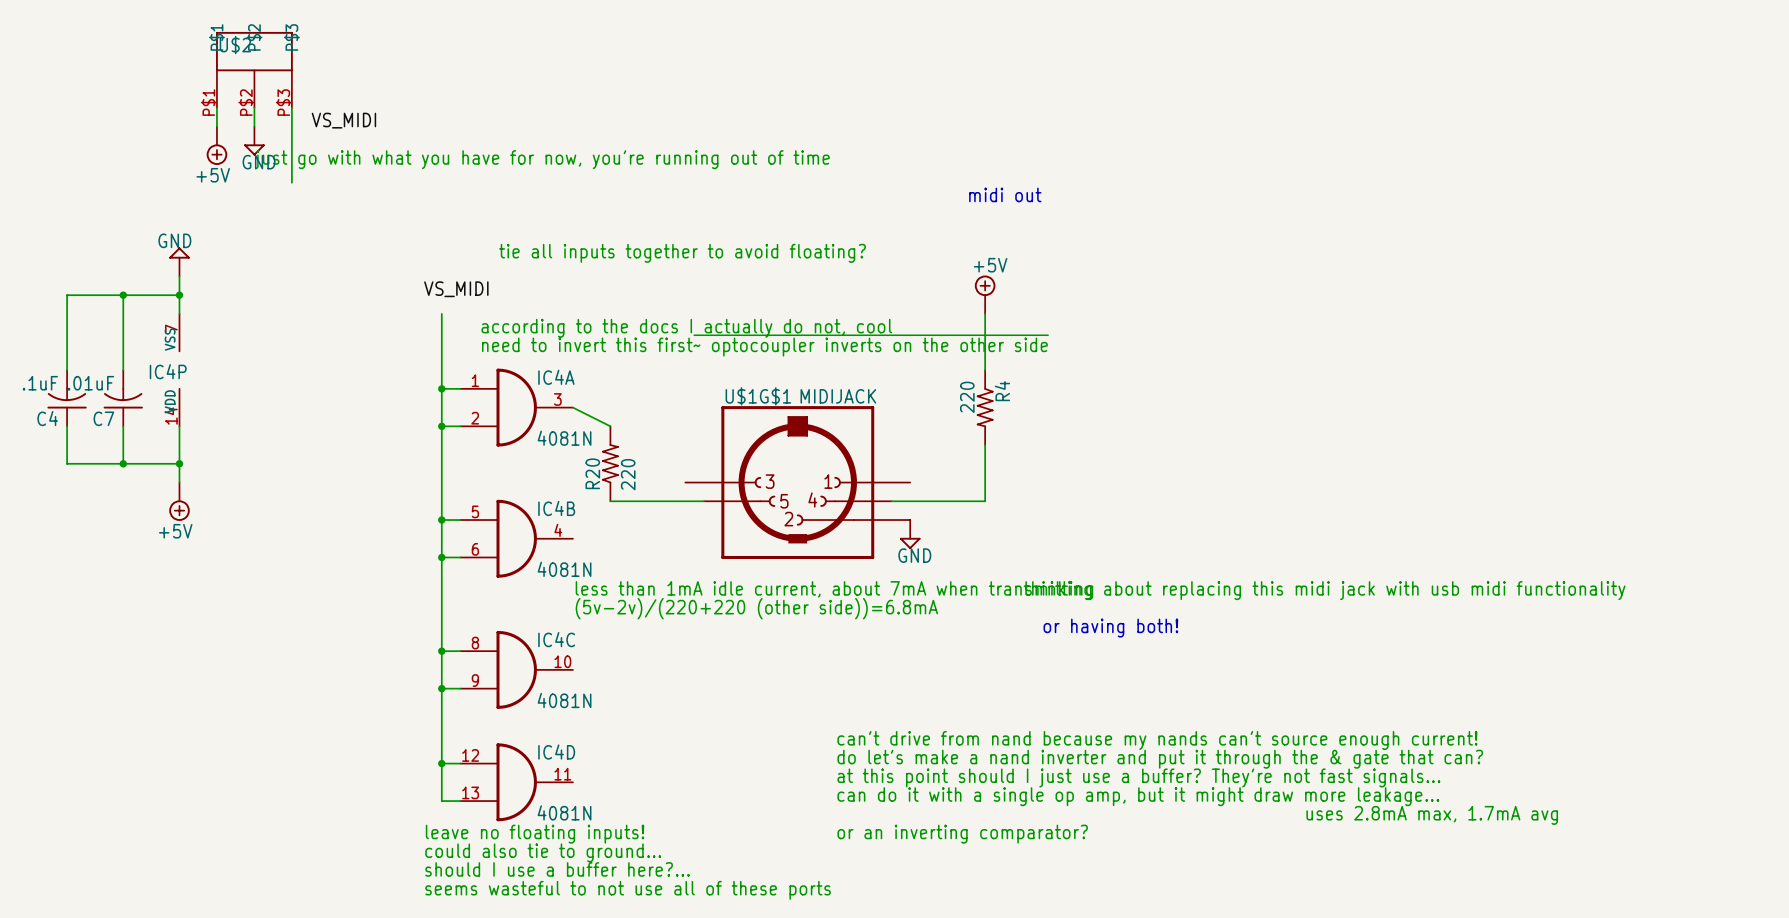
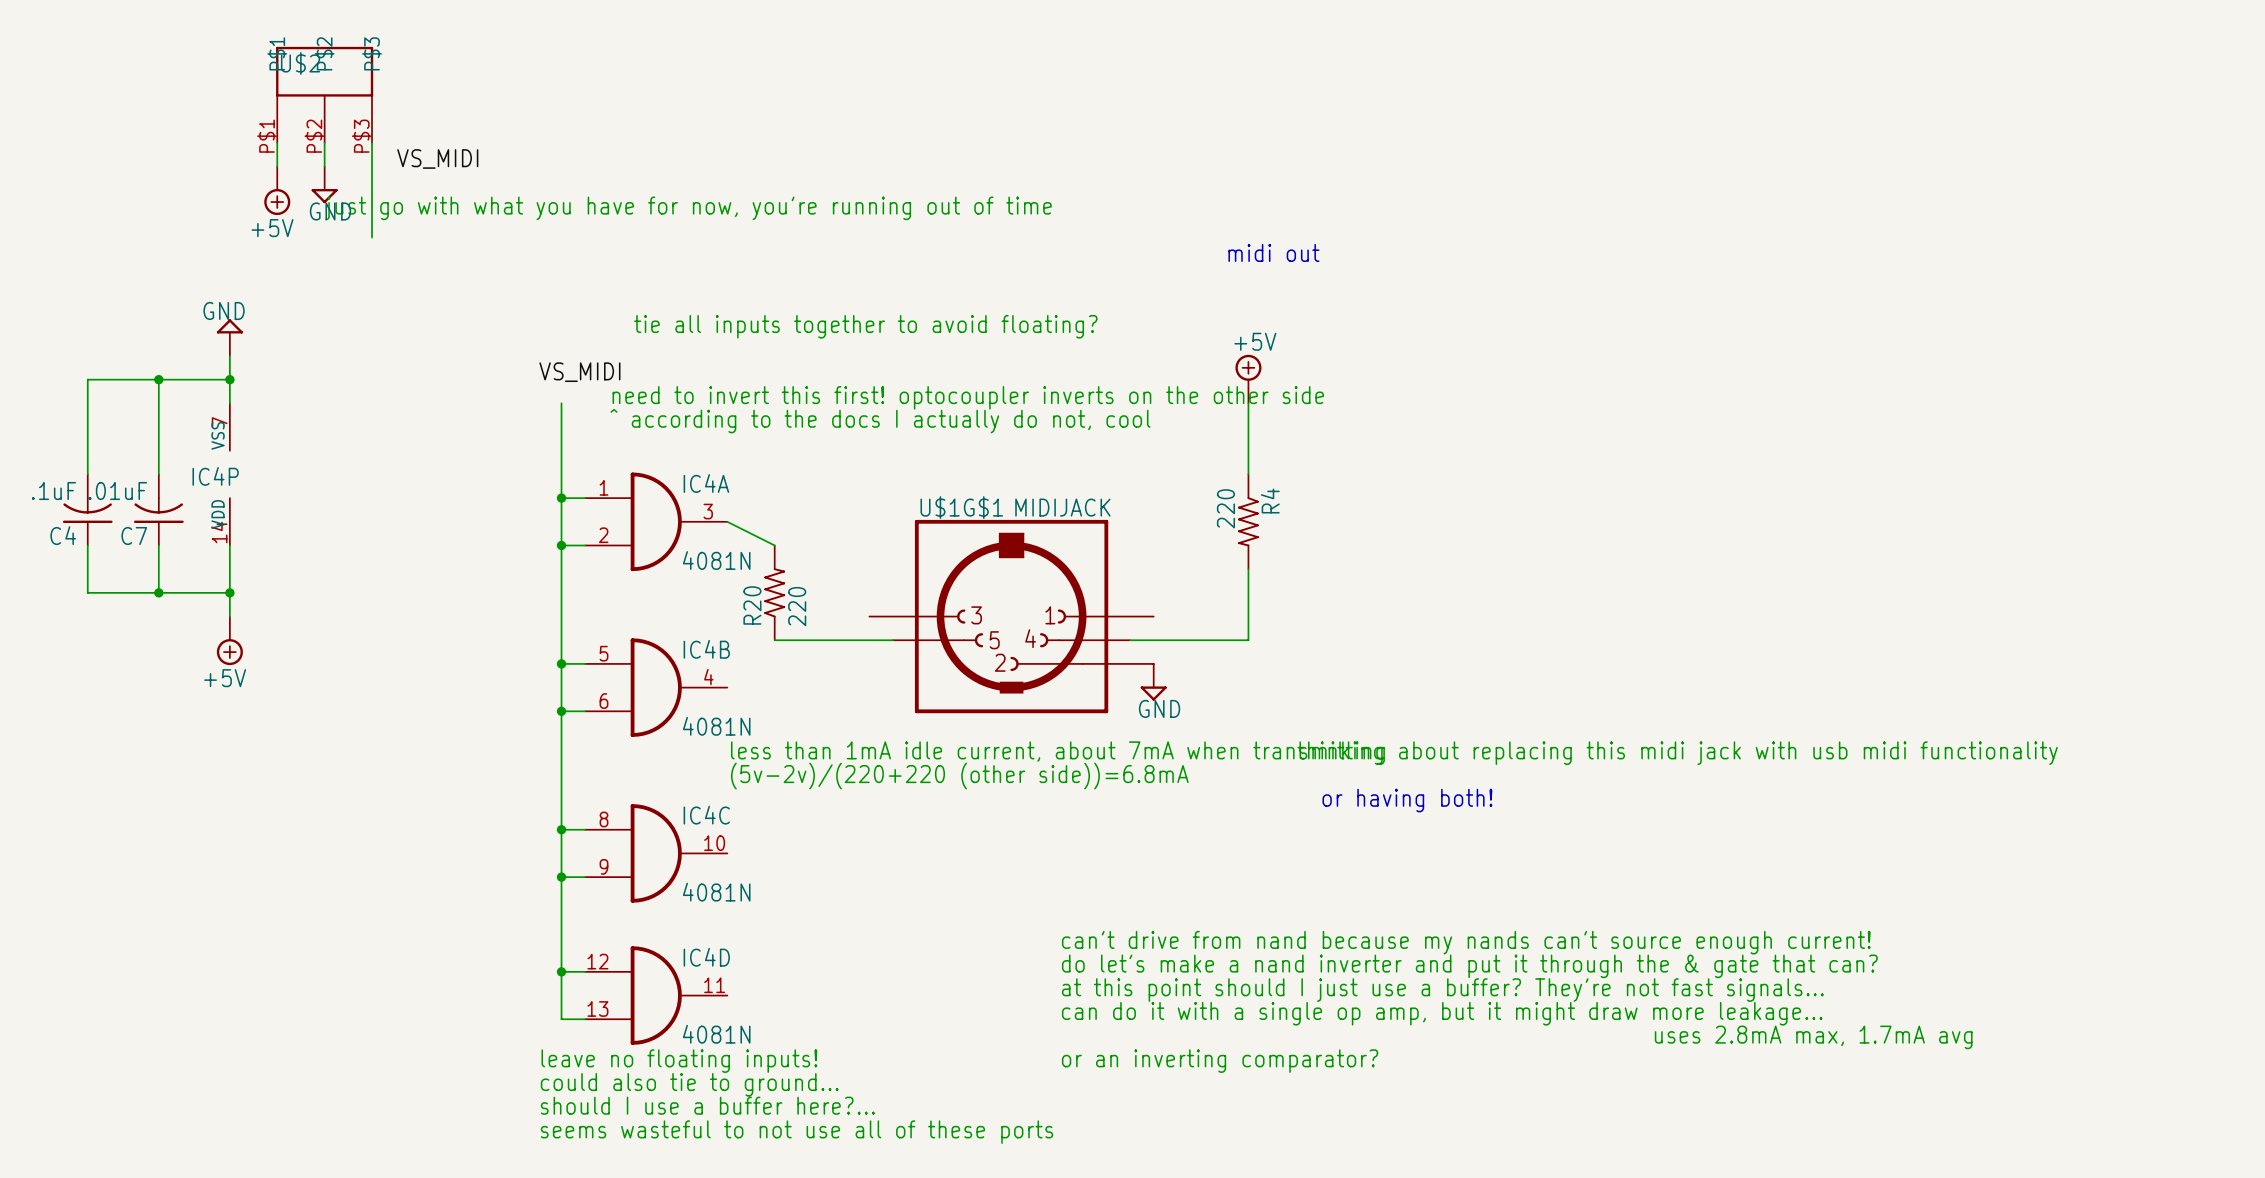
text: none -> need to invert this first! optocoupler inverts on the other side (968, 397)
text: according to the docs I actually do not, cool (686, 328) -> ^ according to the docs I actually do not, cool (880, 421)
text: need to invert this first~{~ optocoupler inverts on the other side} (765, 345) -> none

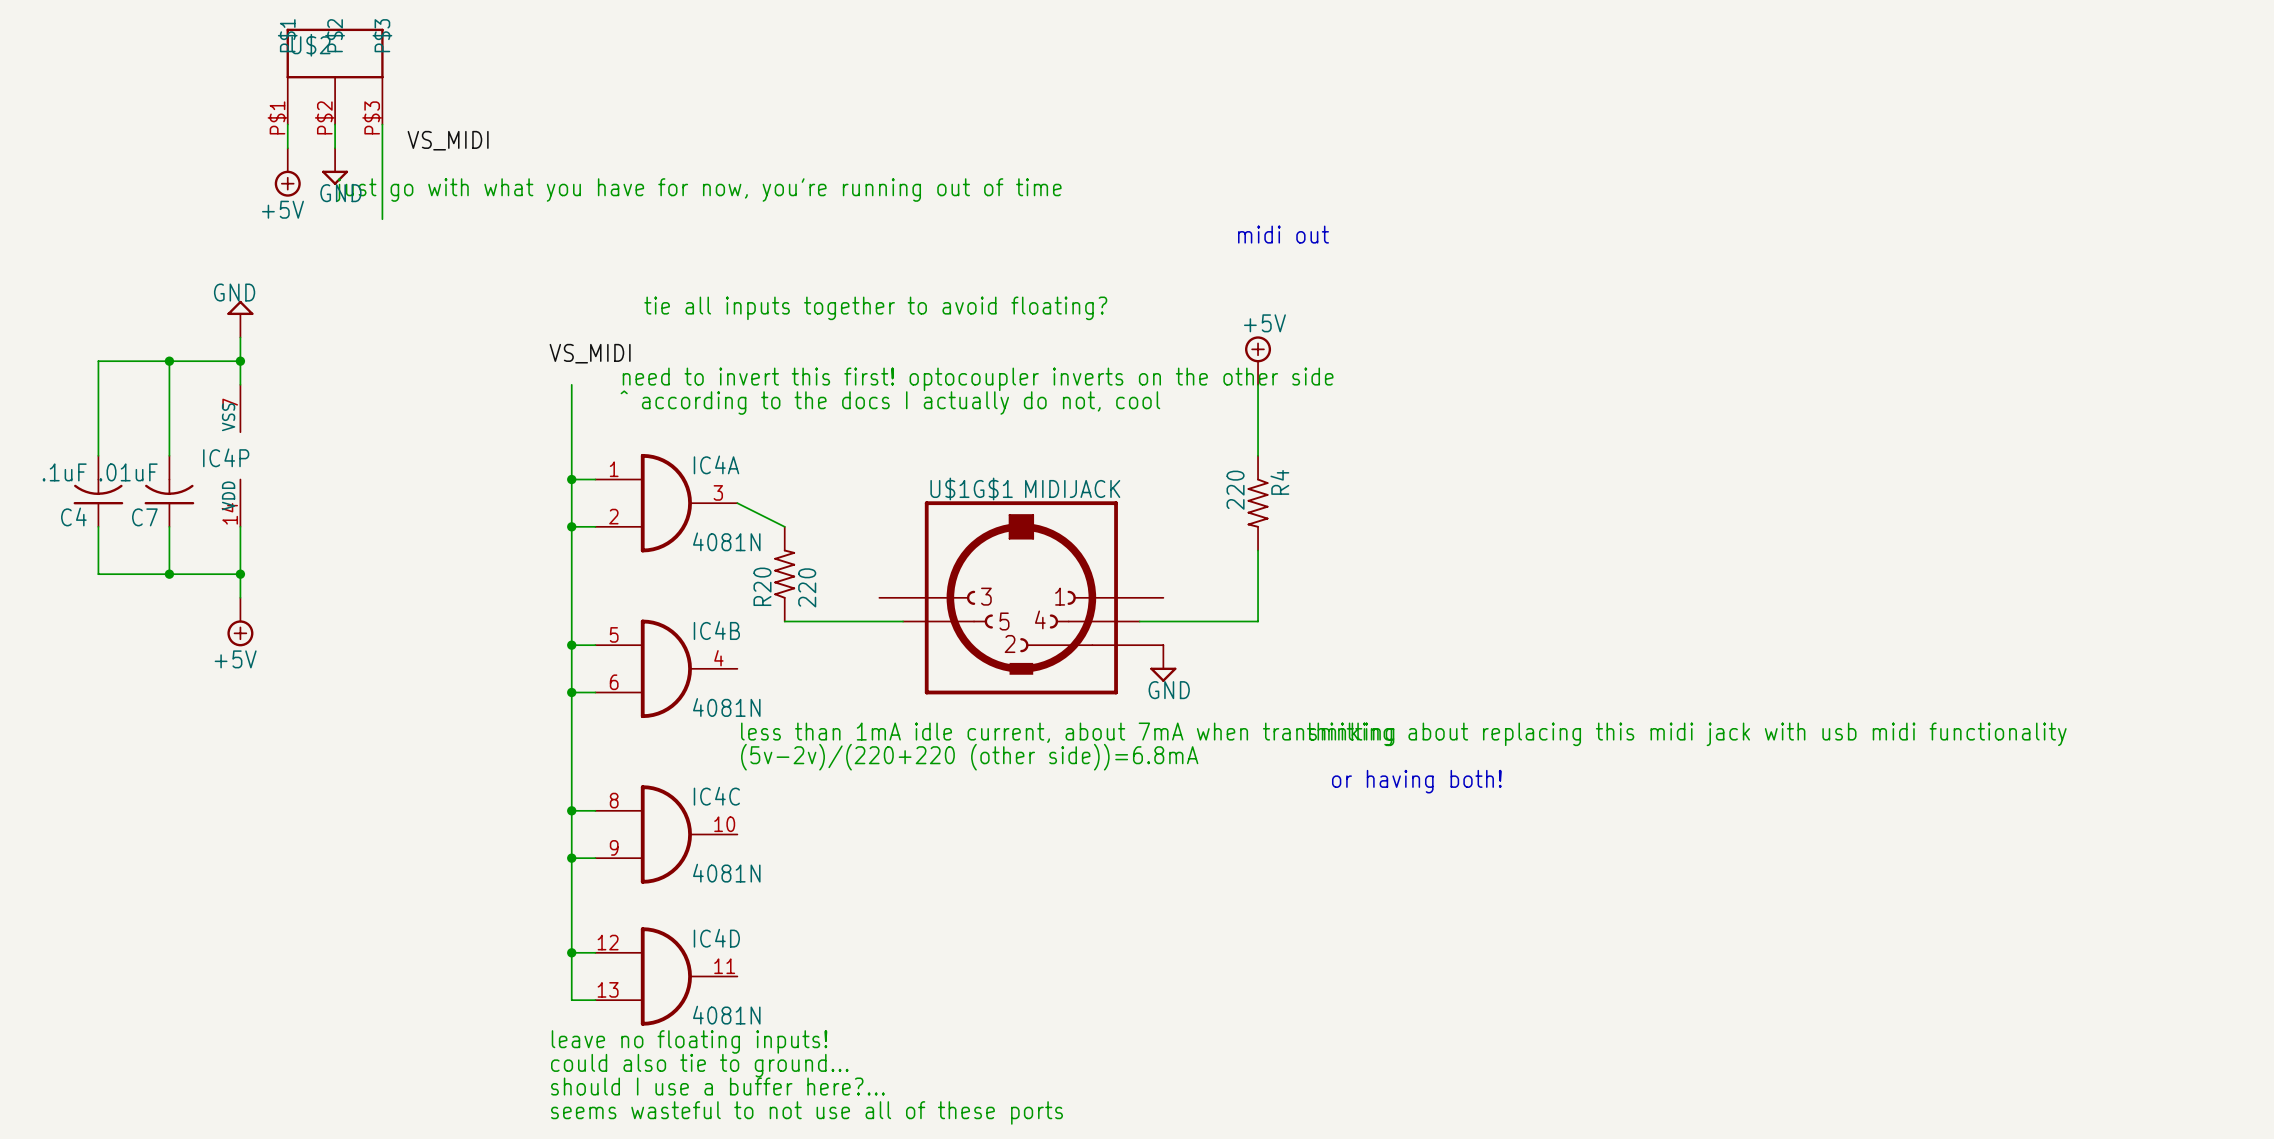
text: can't drive from nand because my nands can't source enough current! (1466, 942) -> none
text: do let's make a nand inverter and put it through the & gate that can? (1469, 966) -> none
text: at this point should I just use a buffer? They're not fast signals... (1442, 990) -> none
text: can do it with a single op amp, but it might draw more leakage... (1442, 1013) -> none
text: uses 2.8mA max, 1.7mA avg (1813, 1037) -> none
text: or an inverting comparator? (1220, 1061) -> none

